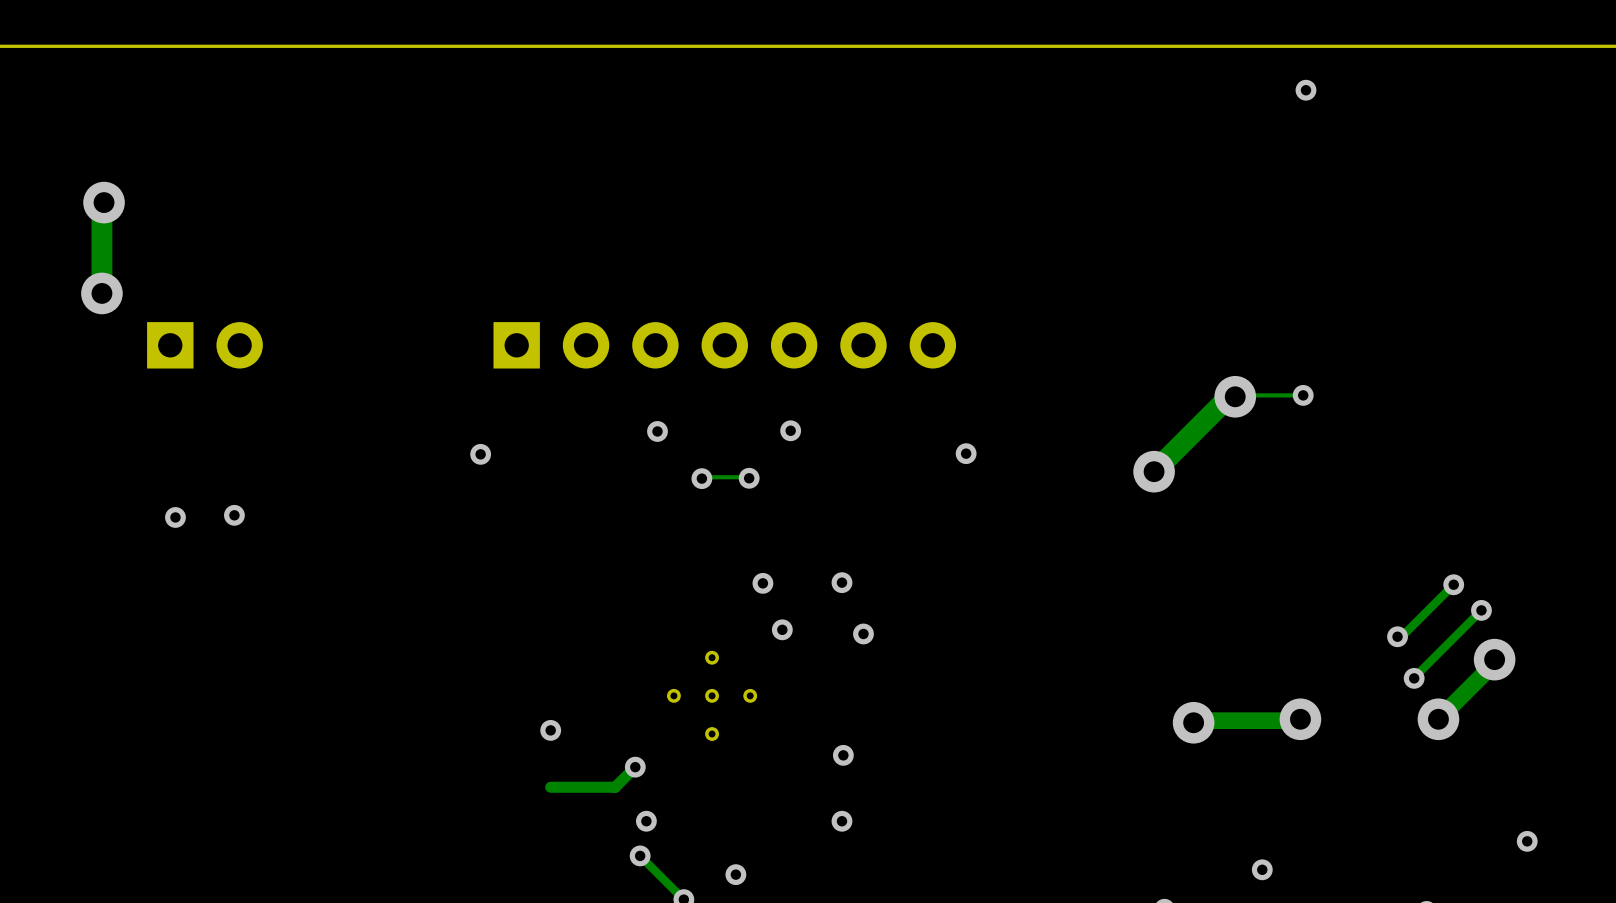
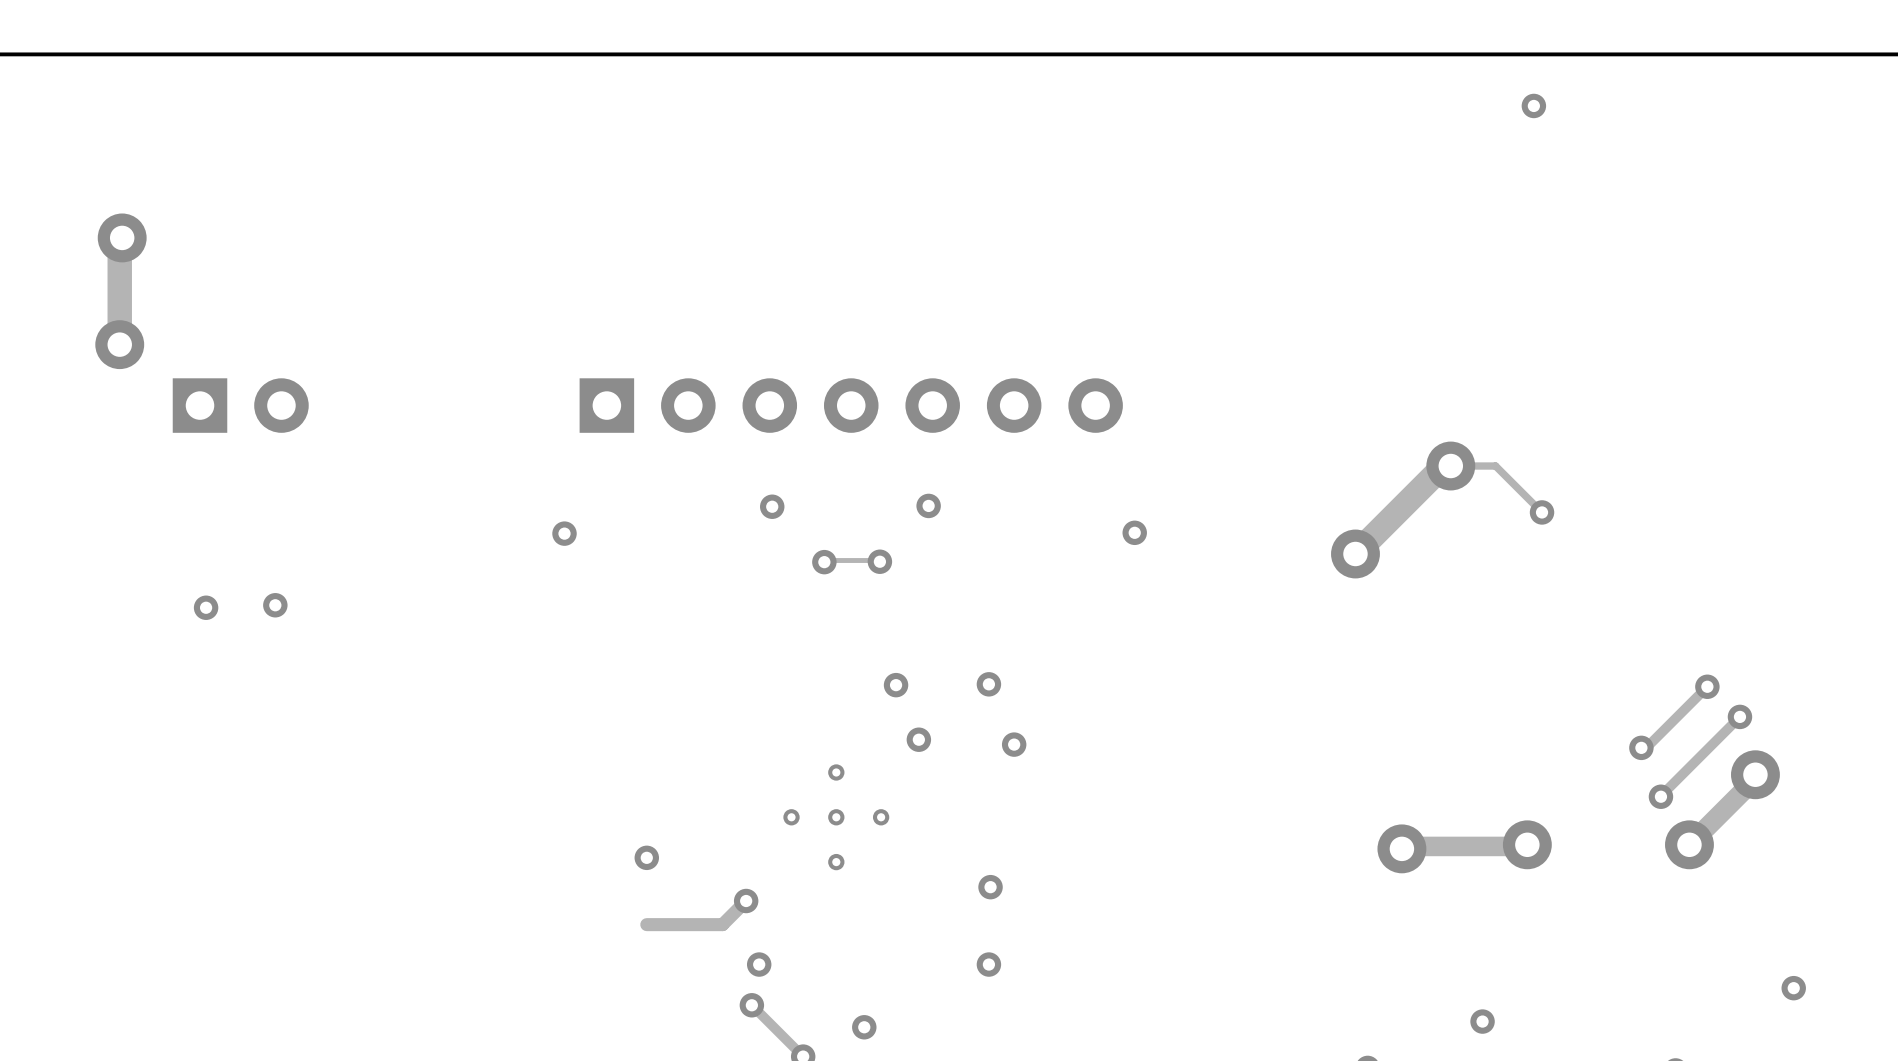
track: (1303, 395) (1235, 396) -> (1542, 512) (1495, 466) (1450, 466)
via position: (1303, 395) -> (1542, 512)

